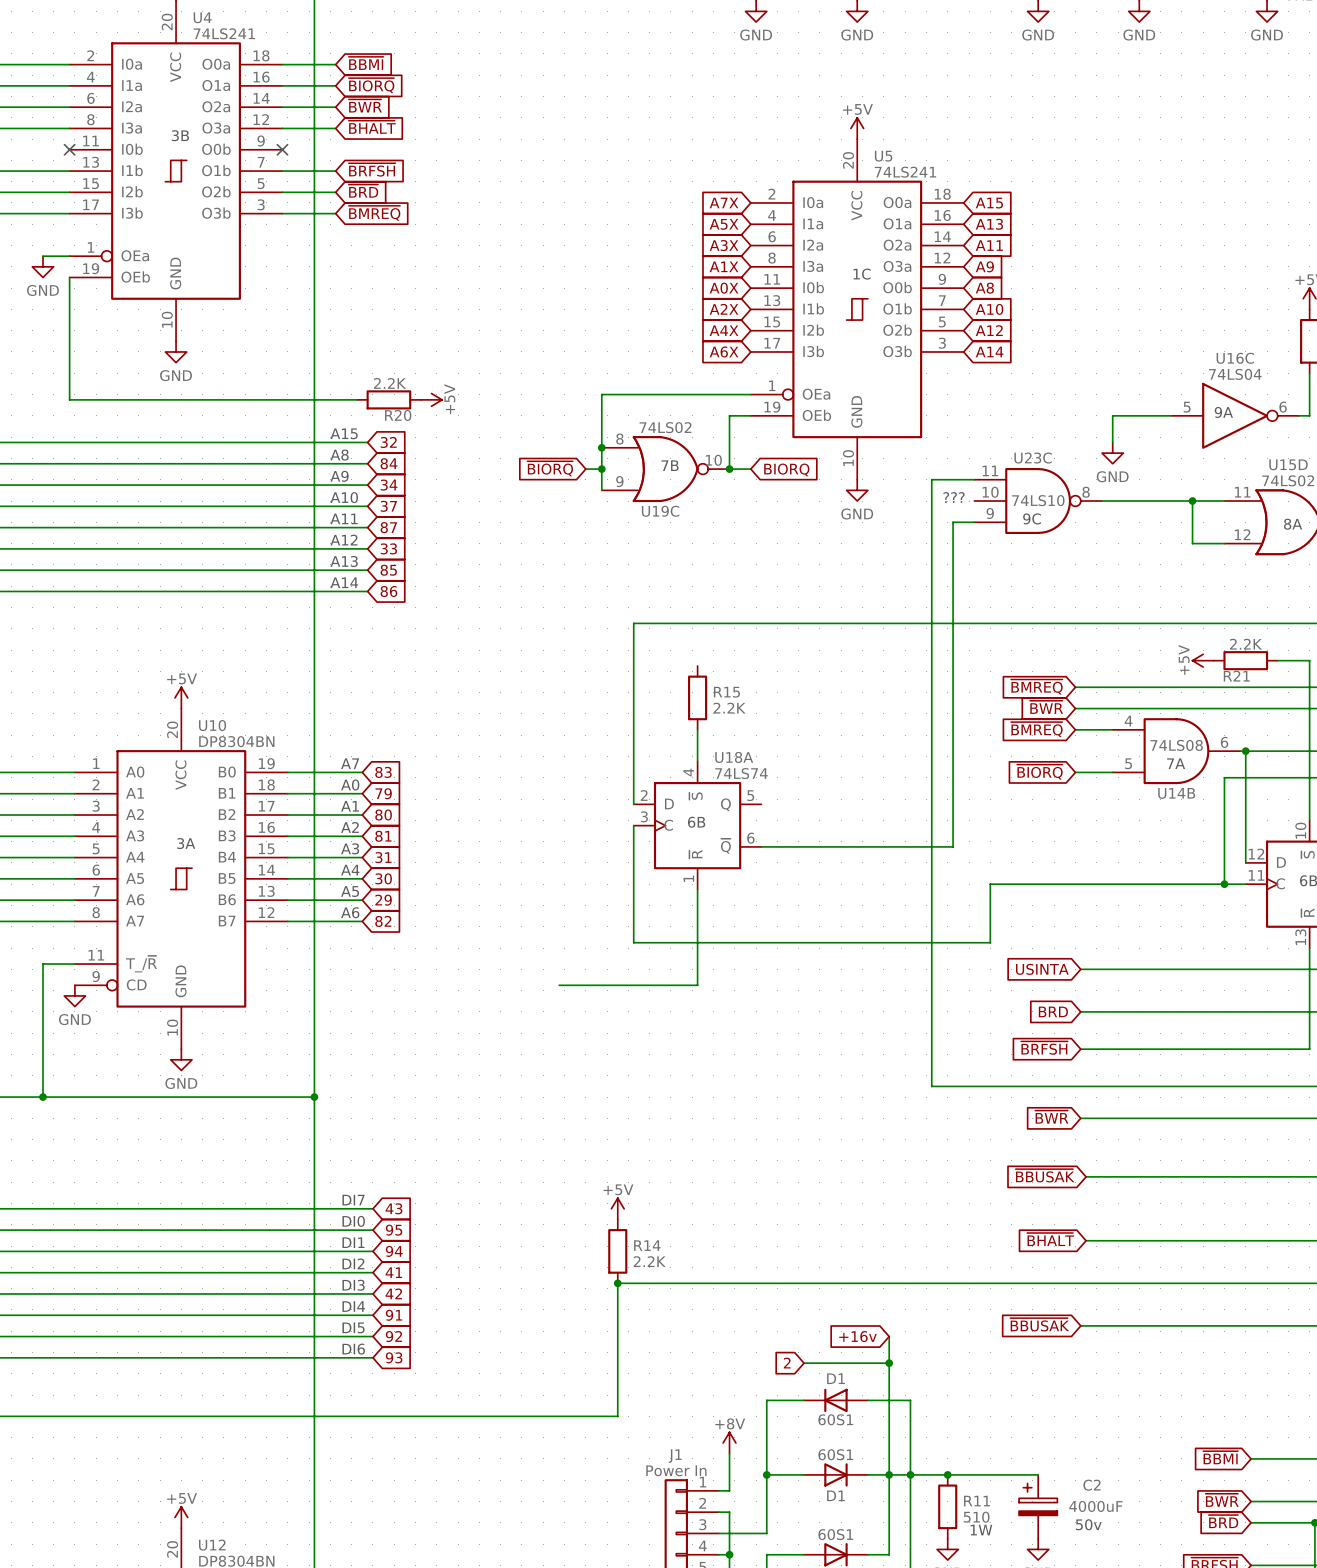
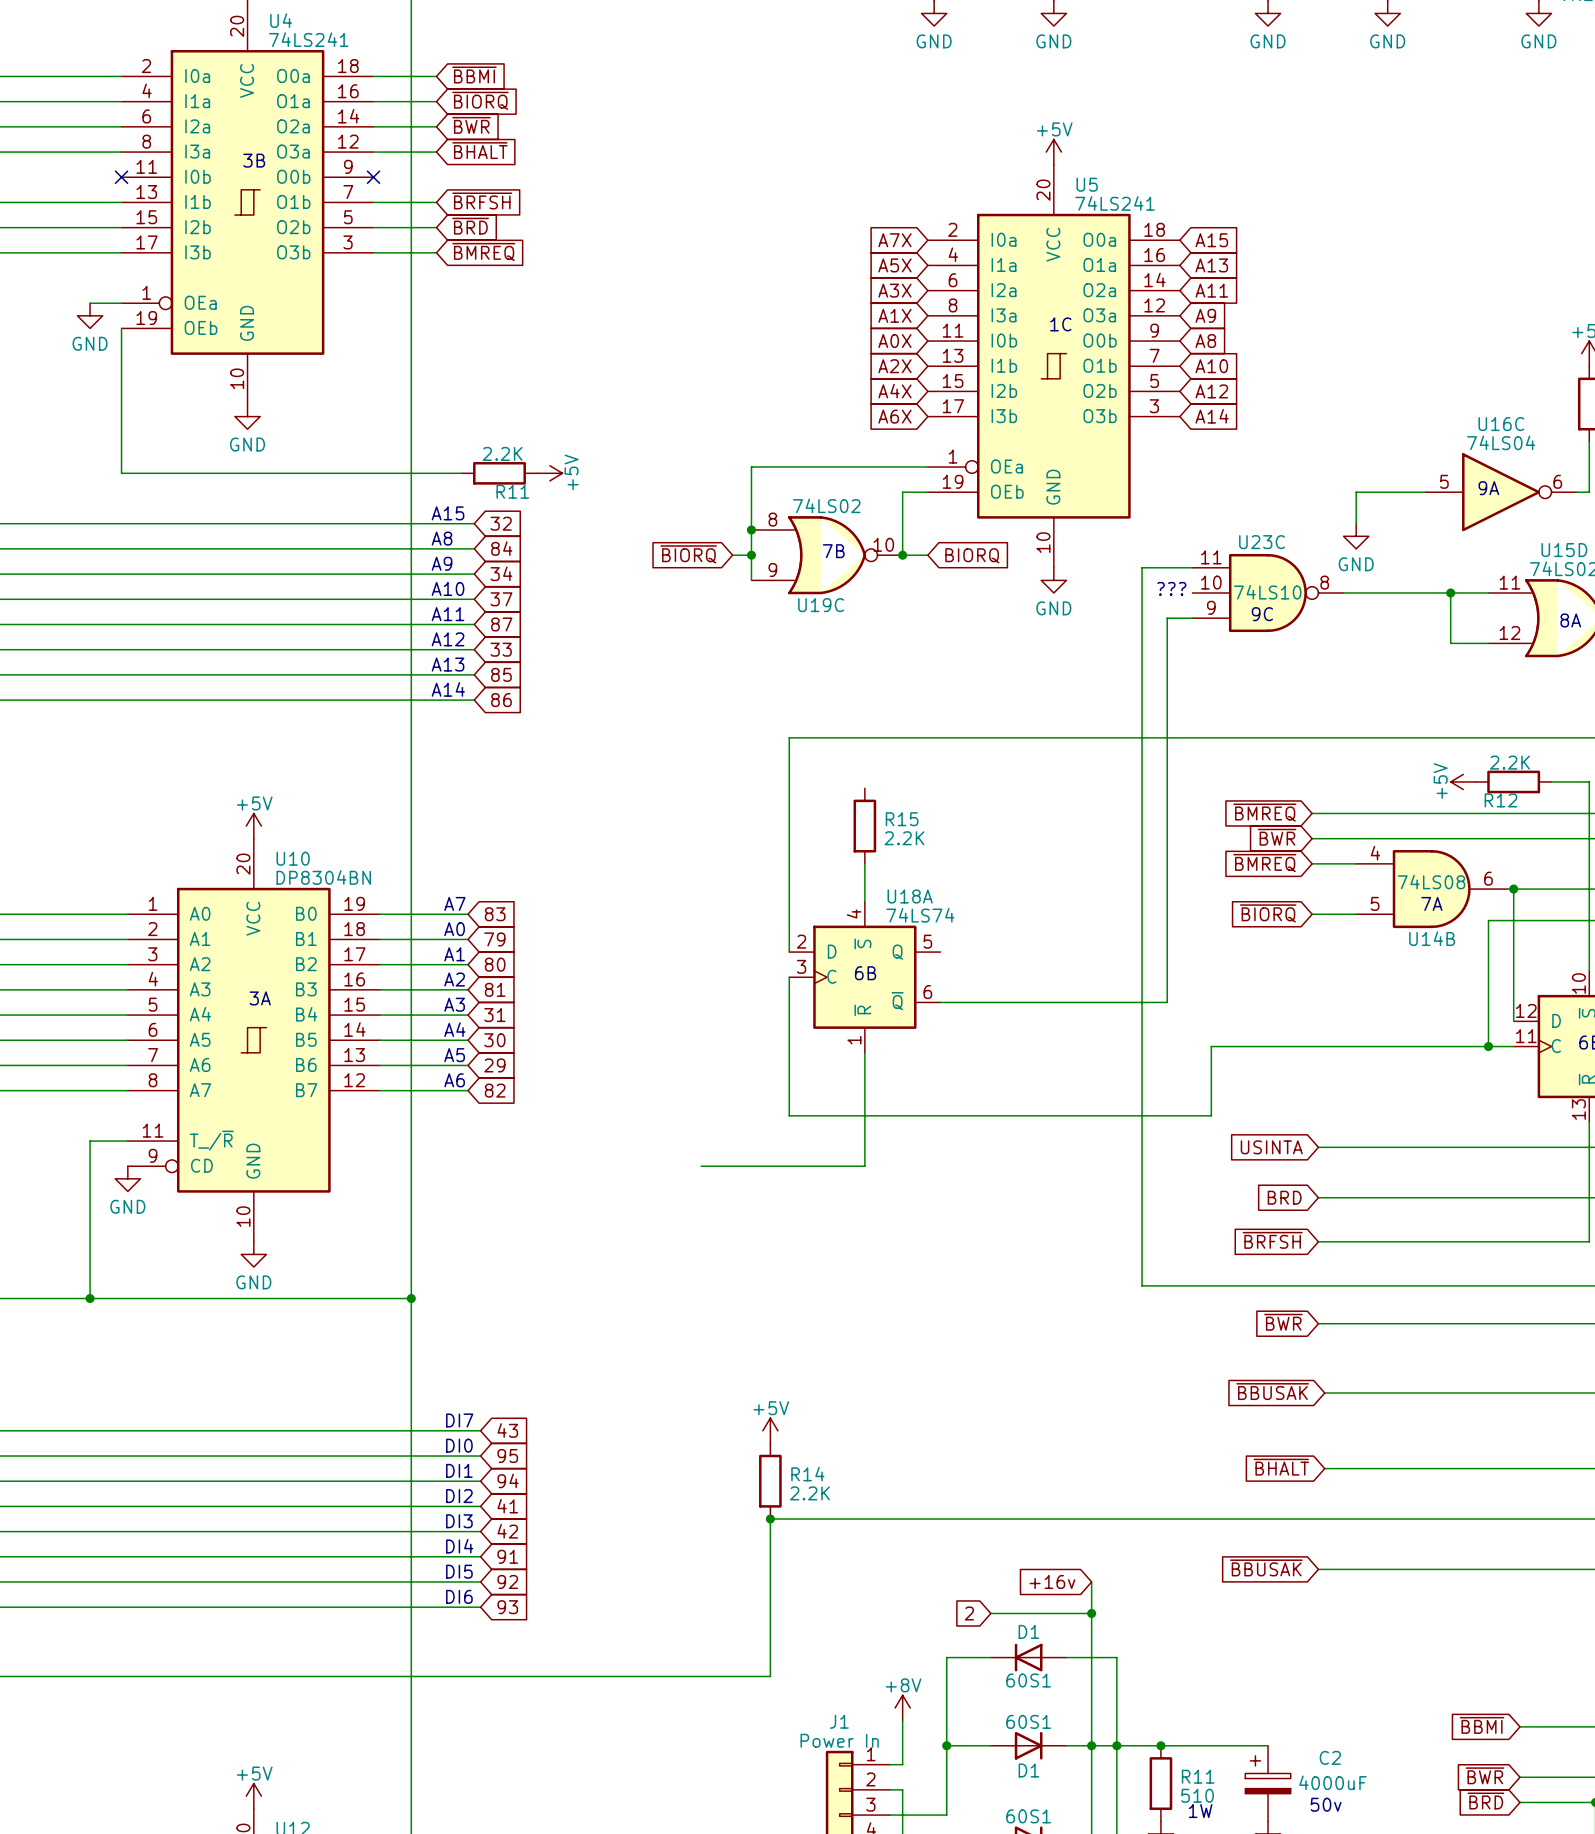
R20 name: R20 (398, 415) -> R11 (512, 491)
R21 name: R21 (1236, 676) -> R12 (1501, 800)

